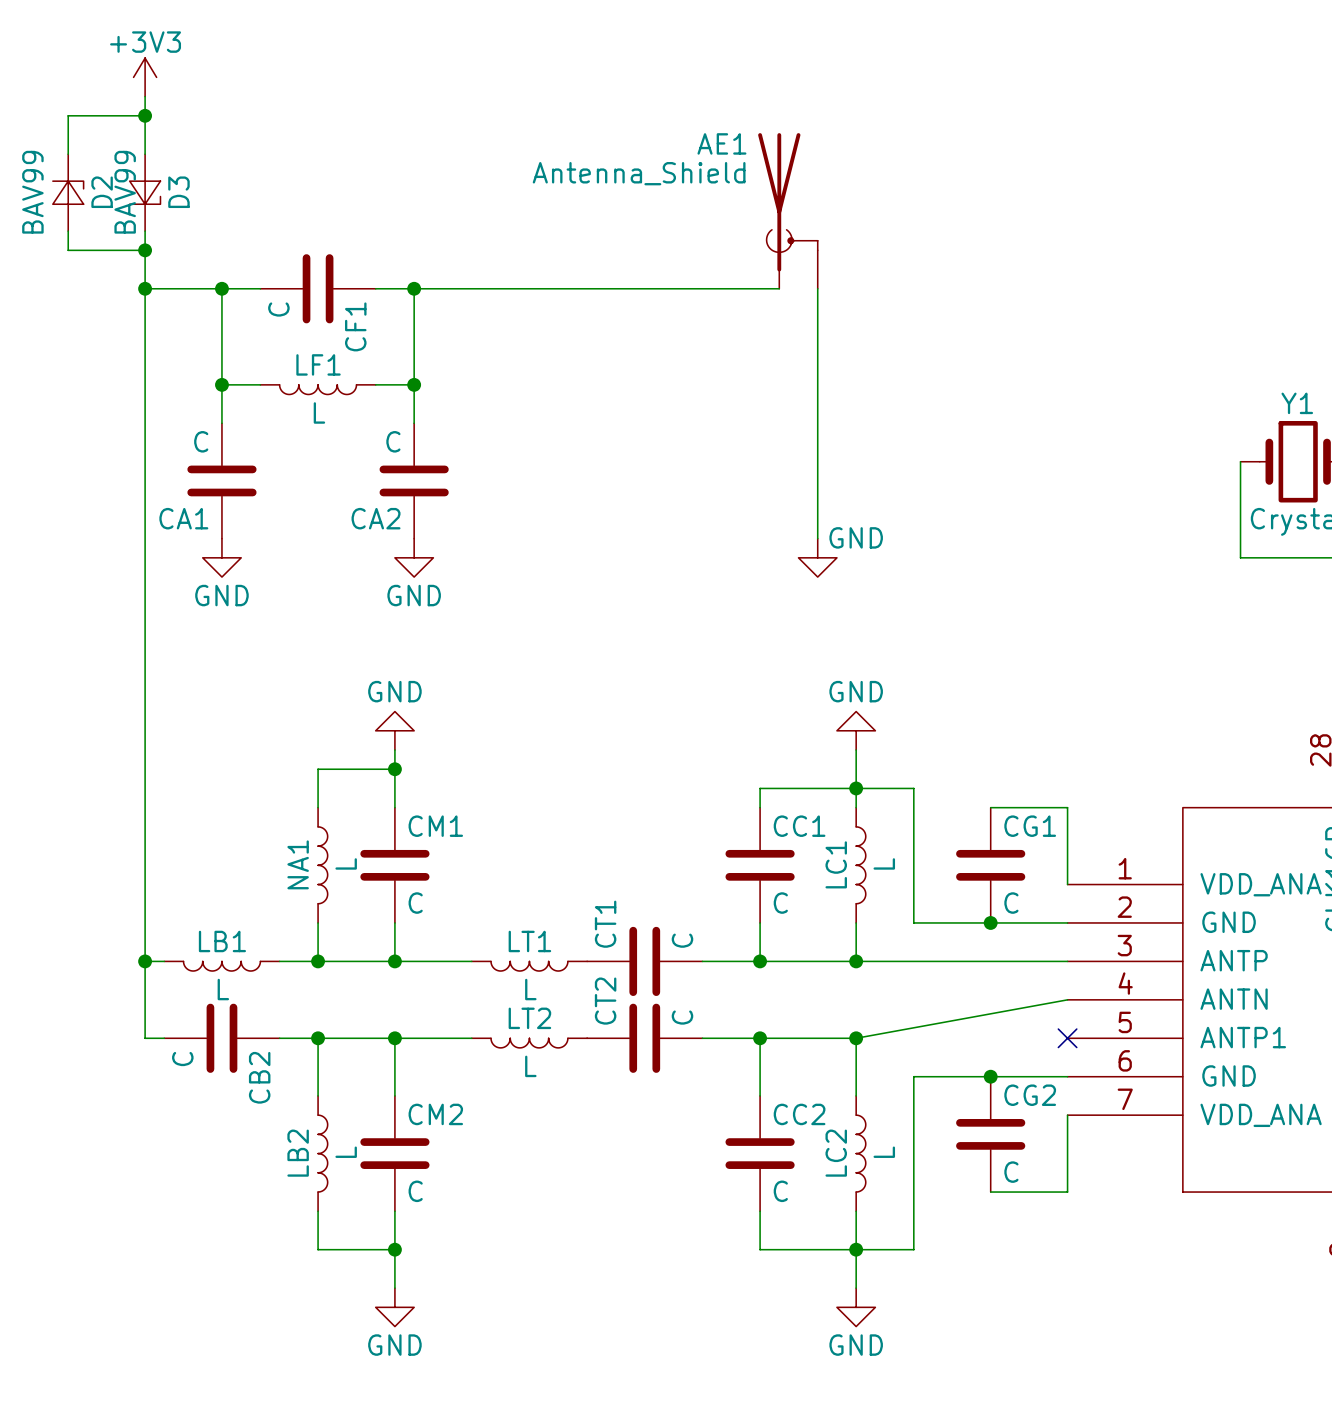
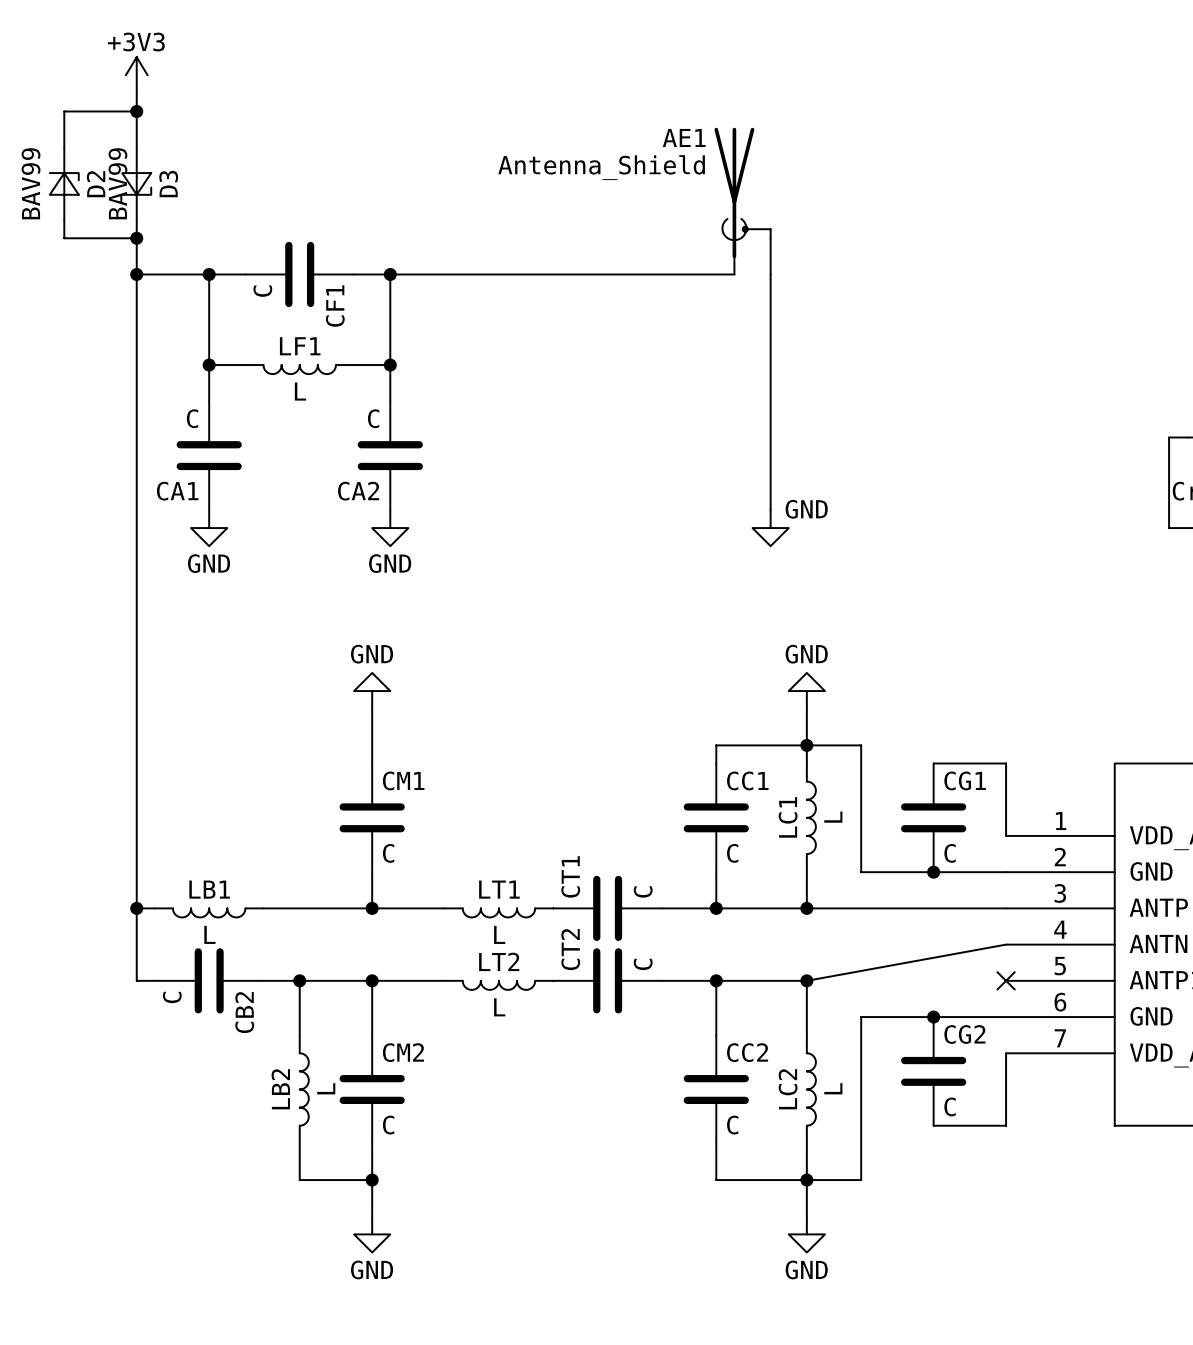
wire: (394, 769) (318, 769) (318, 807) -> none
junction: (394, 769) -> none
NA1: L (322, 865) -> none
wire: (318, 922) (318, 961) -> none
junction: (318, 961) -> none

